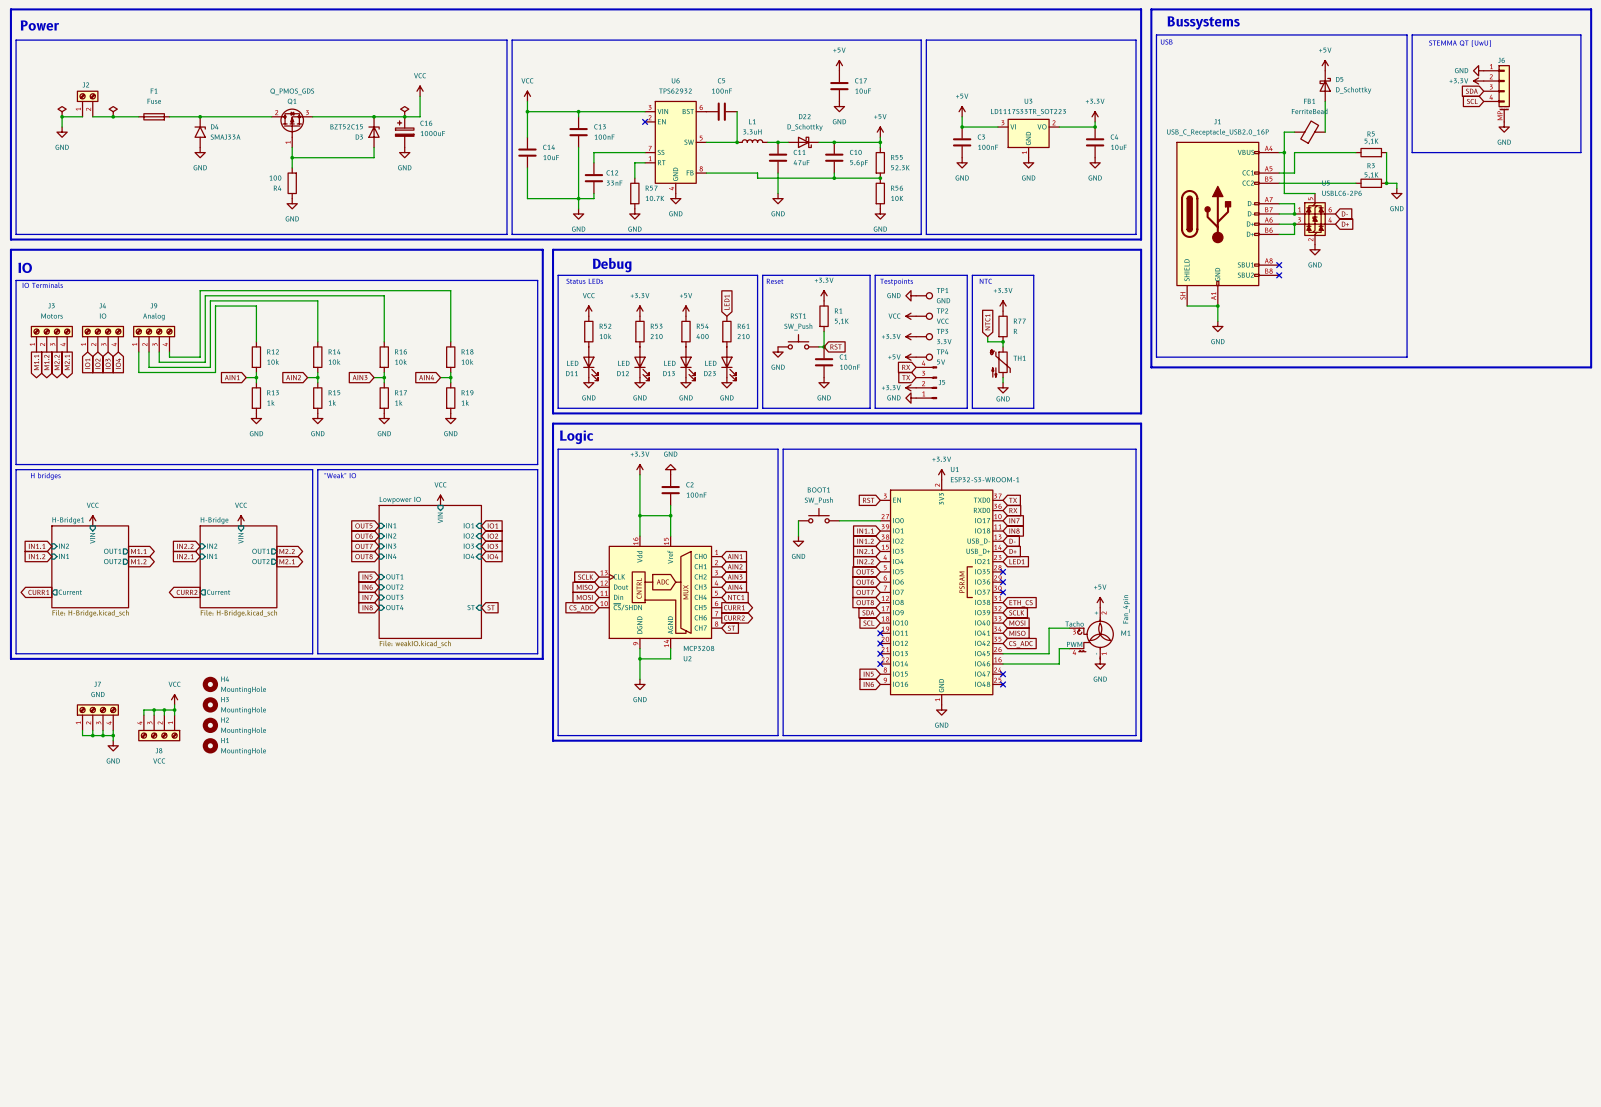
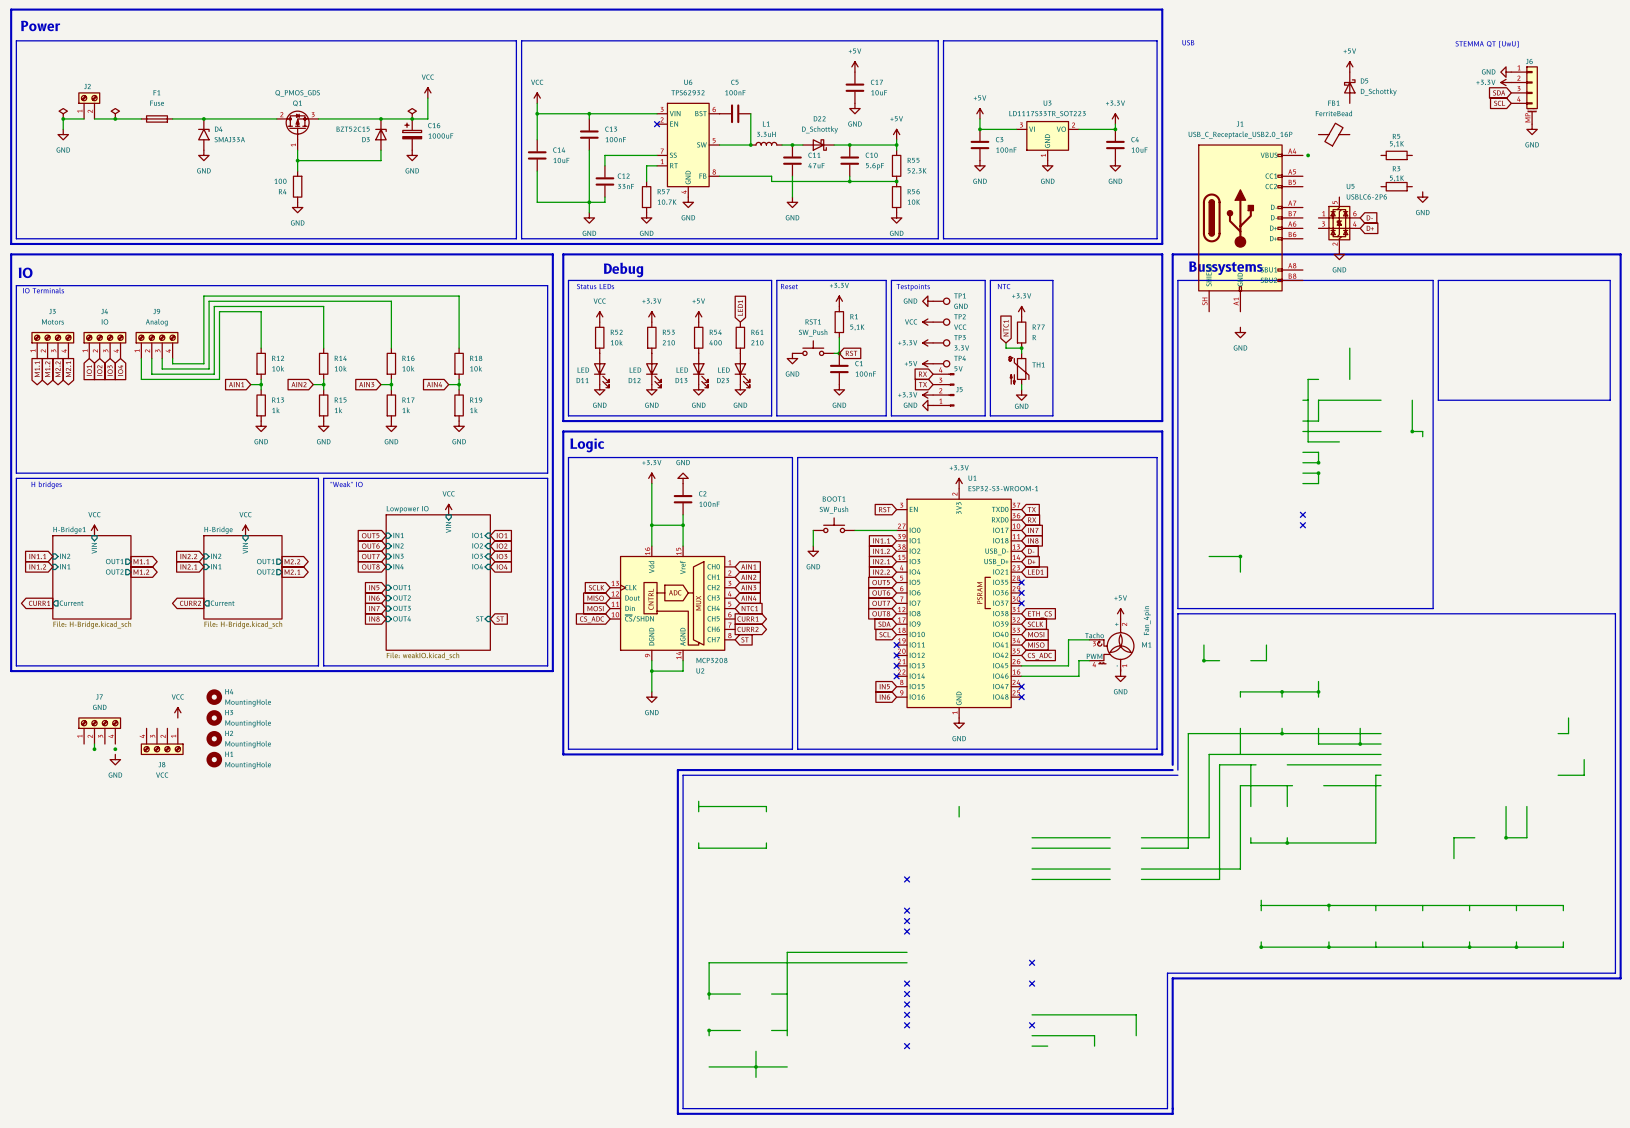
text: Bussystems (1203, 22) -> none
line: (1412, 34) (1580, 34) (1580, 152) (1412, 152) (1412, 34) -> none
wire: (1325, 101) (1325, 132) -> none
wire: (1294, 132) (1284, 132) (1284, 193) (1314, 193) -> none
wire: (1279, 152) (1284, 152) -> none
wire: (1355, 152) (1294, 152) (1294, 173) (1279, 173) -> none
wire: (1386, 152) (1386, 183) (1396, 183) (1396, 188) -> none
wire: (1279, 183) (1355, 183) -> none
junction: (1386, 183) -> none
wire: (1279, 203) (1294, 203) (1294, 213) (1279, 213) -> none
junction: (1294, 213) -> none
wire: (1279, 224) (1294, 224) (1294, 234) (1279, 234) -> none
junction: (1294, 224) -> none
line: (1151, 249) (1151, 9) (1591, 9) (1591, 249) -> (1172, 254) (1620, 254)
text: none -> Bussystems (1225, 268)
no-connect mark: (1279, 265) -> none
line: (1156, 275) (1156, 34) (1407, 34) (1407, 275) -> (1177, 280) (1433, 280)
no-connect mark: (1279, 275) -> none
line: none -> (1438, 280) (1610, 280) (1610, 400) (1438, 400) (1438, 280)
wire: (1187, 306) (1217, 306) (1217, 321) -> none
junction: (1217, 306) -> none
wire: none -> (1349, 348) (1349, 379)
line: (1156, 357) (1407, 357) -> (1177, 363) (1177, 608) (1433, 608) (1433, 363)
line: (1151, 367) (1591, 367) -> (1172, 770) (677, 770) (677, 1113) (1172, 1113) (1172, 978) (1620, 978) (1620, 374)
line: none -> (1172, 374) (1172, 764)
wire: none -> (1318, 379) (1308, 379) (1308, 441) (1339, 441)
wire: none -> (1302, 400) (1308, 400)
wire: none -> (1381, 400) (1318, 400) (1318, 421) (1302, 421)
wire: none -> (1412, 400) (1412, 431) (1422, 431) (1422, 436)
wire: none -> (1302, 431) (1381, 431)
junction: none -> (1412, 431)
wire: none -> (1302, 452) (1318, 452) (1318, 462) (1302, 462)
junction: none -> (1318, 462)
wire: none -> (1302, 473) (1318, 473) (1318, 483) (1302, 483)
junction: none -> (1318, 473)
no-connect mark: none -> (1302, 514)
no-connect mark: none -> (1302, 525)
wire: none -> (1209, 556) (1240, 556) (1240, 572)
junction: none -> (1240, 556)
wire: none -> (1203, 645) (1203, 660) (1219, 660)
wire: none -> (1266, 645) (1266, 660) (1250, 660)
junction: none -> (1203, 660)
wire: none -> (1318, 681) (1318, 697)
wire: none -> (1282, 691) (1282, 697)
junction: none -> (1282, 691)
wire: none -> (1318, 691) (1240, 691) (1240, 697)
junction: none -> (1318, 691)
wire: (174, 704) (174, 715) -> none
wire: none -> (1568, 717) (1568, 733) (1558, 733)
wire: (154, 710) (154, 715) -> none
junction: (154, 710) -> none
wire: (164, 710) (164, 715) -> none
junction: (164, 710) -> none
wire: (174, 710) (143, 710) (143, 715) -> none
junction: (174, 710) -> none
wire: none -> (1240, 728) (1240, 754)
wire: none -> (1282, 728) (1282, 733)
wire: none -> (1318, 728) (1318, 744) (1381, 744)
wire: none -> (1360, 728) (1360, 744)
junction: none -> (1282, 733)
wire: none -> (1381, 733) (1188, 733) (1188, 848) (1141, 848)
wire: (82, 730) (82, 735) (113, 735) -> none
wire: (102, 730) (102, 735) -> none
wire: (113, 730) (113, 740) -> none
junction: none -> (1360, 744)
junction: (102, 735) -> none
wire: none -> (1381, 754) (1209, 754) (1209, 837) (1141, 837)
wire: none -> (1584, 759) (1584, 775) (1558, 775)
wire: none -> (1250, 764) (1250, 806)
wire: none -> (1256, 764) (1219, 764) (1219, 879) (1141, 879)
wire: none -> (1287, 764) (1381, 764)
line: none -> (1177, 770) (1177, 613) (1615, 613) (1615, 973) (1167, 973) (1167, 1108) (683, 1108) (683, 775) (1177, 775)
wire: none -> (1381, 775) (1375, 775) (1375, 842) (1250, 842) (1250, 837)
wire: none -> (1287, 785) (1287, 806)
wire: none -> (1292, 785) (1240, 785) (1240, 869) (1141, 869)
wire: none -> (1323, 785) (1381, 785)
wire: none -> (698, 801) (698, 811)
wire: none -> (698, 806) (766, 806) (766, 811)
wire: none -> (959, 806) (959, 816)
wire: none -> (1506, 806) (1506, 837) (1526, 837) (1526, 806)
wire: none -> (1032, 837) (1110, 837)
wire: none -> (1287, 837) (1287, 842)
wire: none -> (1474, 837) (1453, 837) (1453, 858)
junction: none -> (1506, 837)
wire: none -> (698, 842) (698, 848) (766, 848) (766, 842)
junction: none -> (1287, 842)
wire: none -> (1032, 848) (1110, 848)
wire: none -> (1032, 869) (1110, 869)
no-connect mark: none -> (907, 879)
wire: none -> (1032, 879) (1110, 879)
wire: none -> (1261, 900) (1261, 910)
wire: none -> (1261, 905) (1563, 905) (1563, 910)
wire: none -> (1328, 905) (1328, 910)
junction: none -> (1328, 905)
wire: none -> (1375, 905) (1375, 910)
wire: none -> (1422, 905) (1422, 910)
wire: none -> (1469, 905) (1469, 910)
wire: none -> (1516, 905) (1516, 910)
no-connect mark: none -> (907, 910)
no-connect mark: none -> (907, 921)
no-connect mark: none -> (907, 931)
wire: none -> (1261, 941) (1261, 947) (1563, 947) (1563, 941)
wire: none -> (1328, 941) (1328, 947)
wire: none -> (1375, 941) (1375, 947)
wire: none -> (1422, 941) (1422, 947)
wire: none -> (1469, 941) (1469, 947)
wire: none -> (1516, 941) (1516, 947)
junction: none -> (1261, 947)
junction: none -> (1328, 947)
junction: none -> (1469, 947)
junction: none -> (1516, 947)
wire: none -> (907, 952) (787, 952) (787, 1035)
wire: none -> (907, 962) (709, 962) (709, 999)
no-connect mark: none -> (1032, 962)
no-connect mark: none -> (907, 983)
no-connect mark: none -> (1032, 983)
wire: none -> (709, 994) (740, 994)
junction: none -> (709, 994)
wire: none -> (771, 994) (787, 994)
no-connect mark: none -> (907, 994)
no-connect mark: none -> (907, 1004)
no-connect mark: none -> (907, 1014)
wire: none -> (1032, 1014) (1136, 1014) (1136, 1035)
no-connect mark: none -> (907, 1025)
no-connect mark: none -> (1032, 1025)
junction: none -> (709, 1030)
wire: none -> (740, 1030) (709, 1030) (709, 1035)
wire: none -> (771, 1030) (787, 1030)
wire: none -> (1032, 1035) (1094, 1035) (1094, 1046)
no-connect mark: none -> (907, 1046)
wire: none -> (1032, 1046) (1047, 1046)
wire: none -> (755, 1051) (755, 1077)
wire: none -> (709, 1066) (787, 1066)
junction: none -> (755, 1066)

